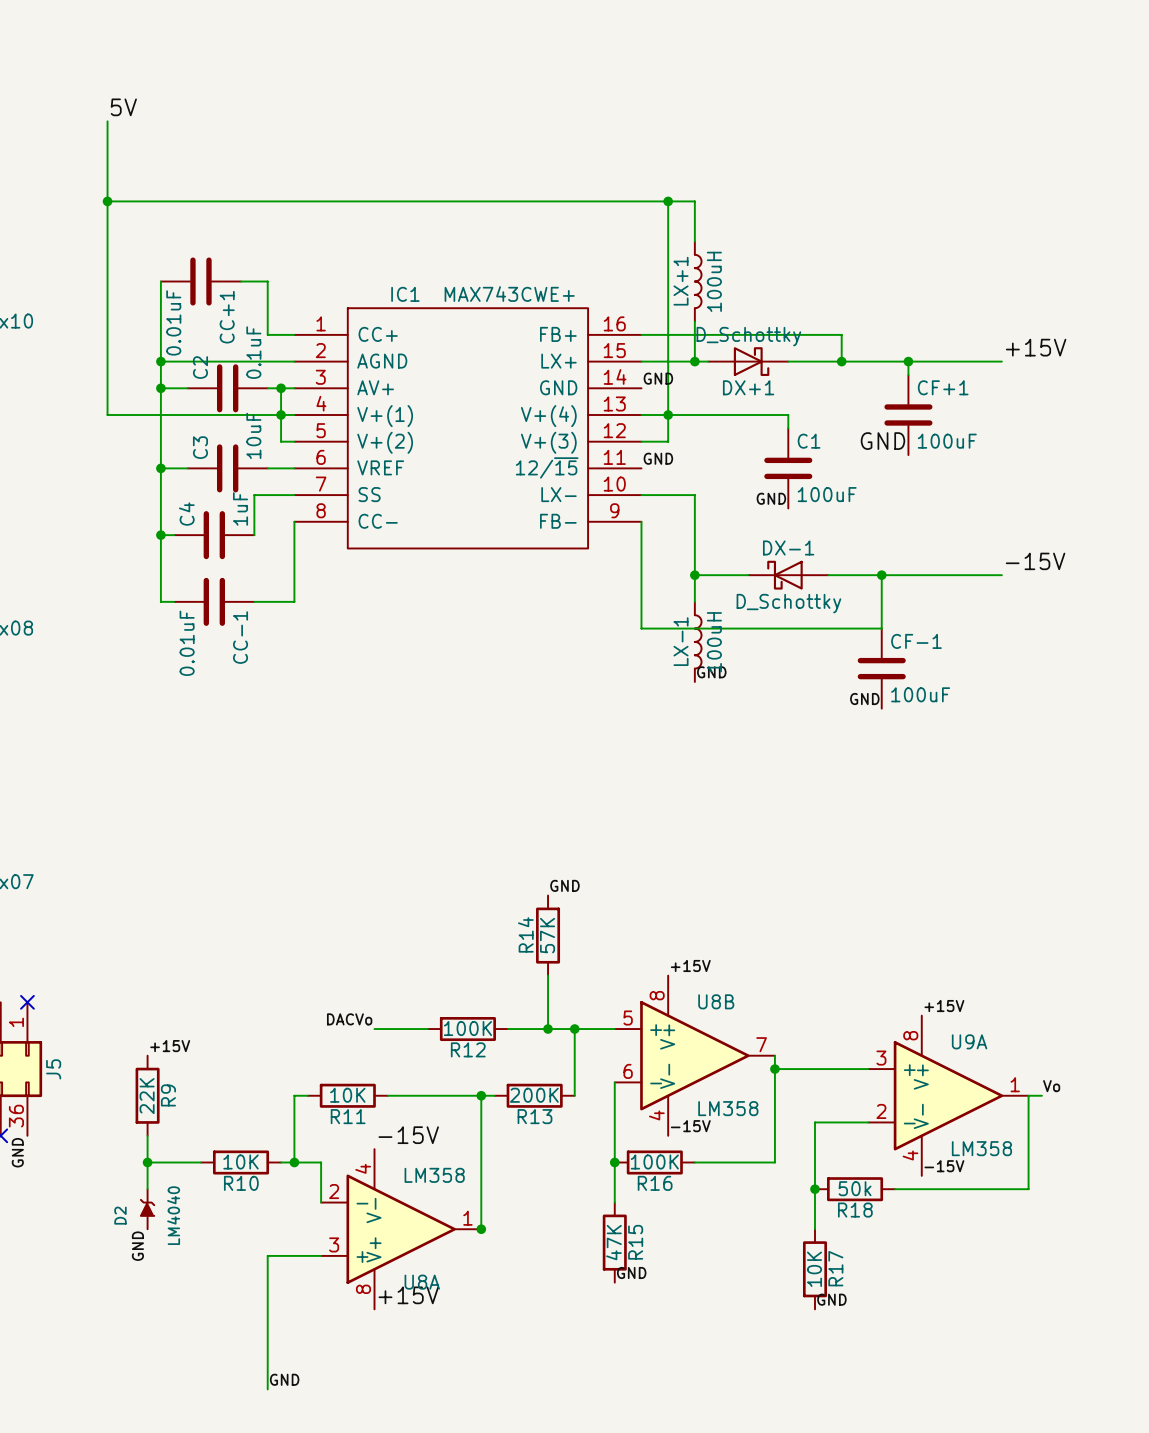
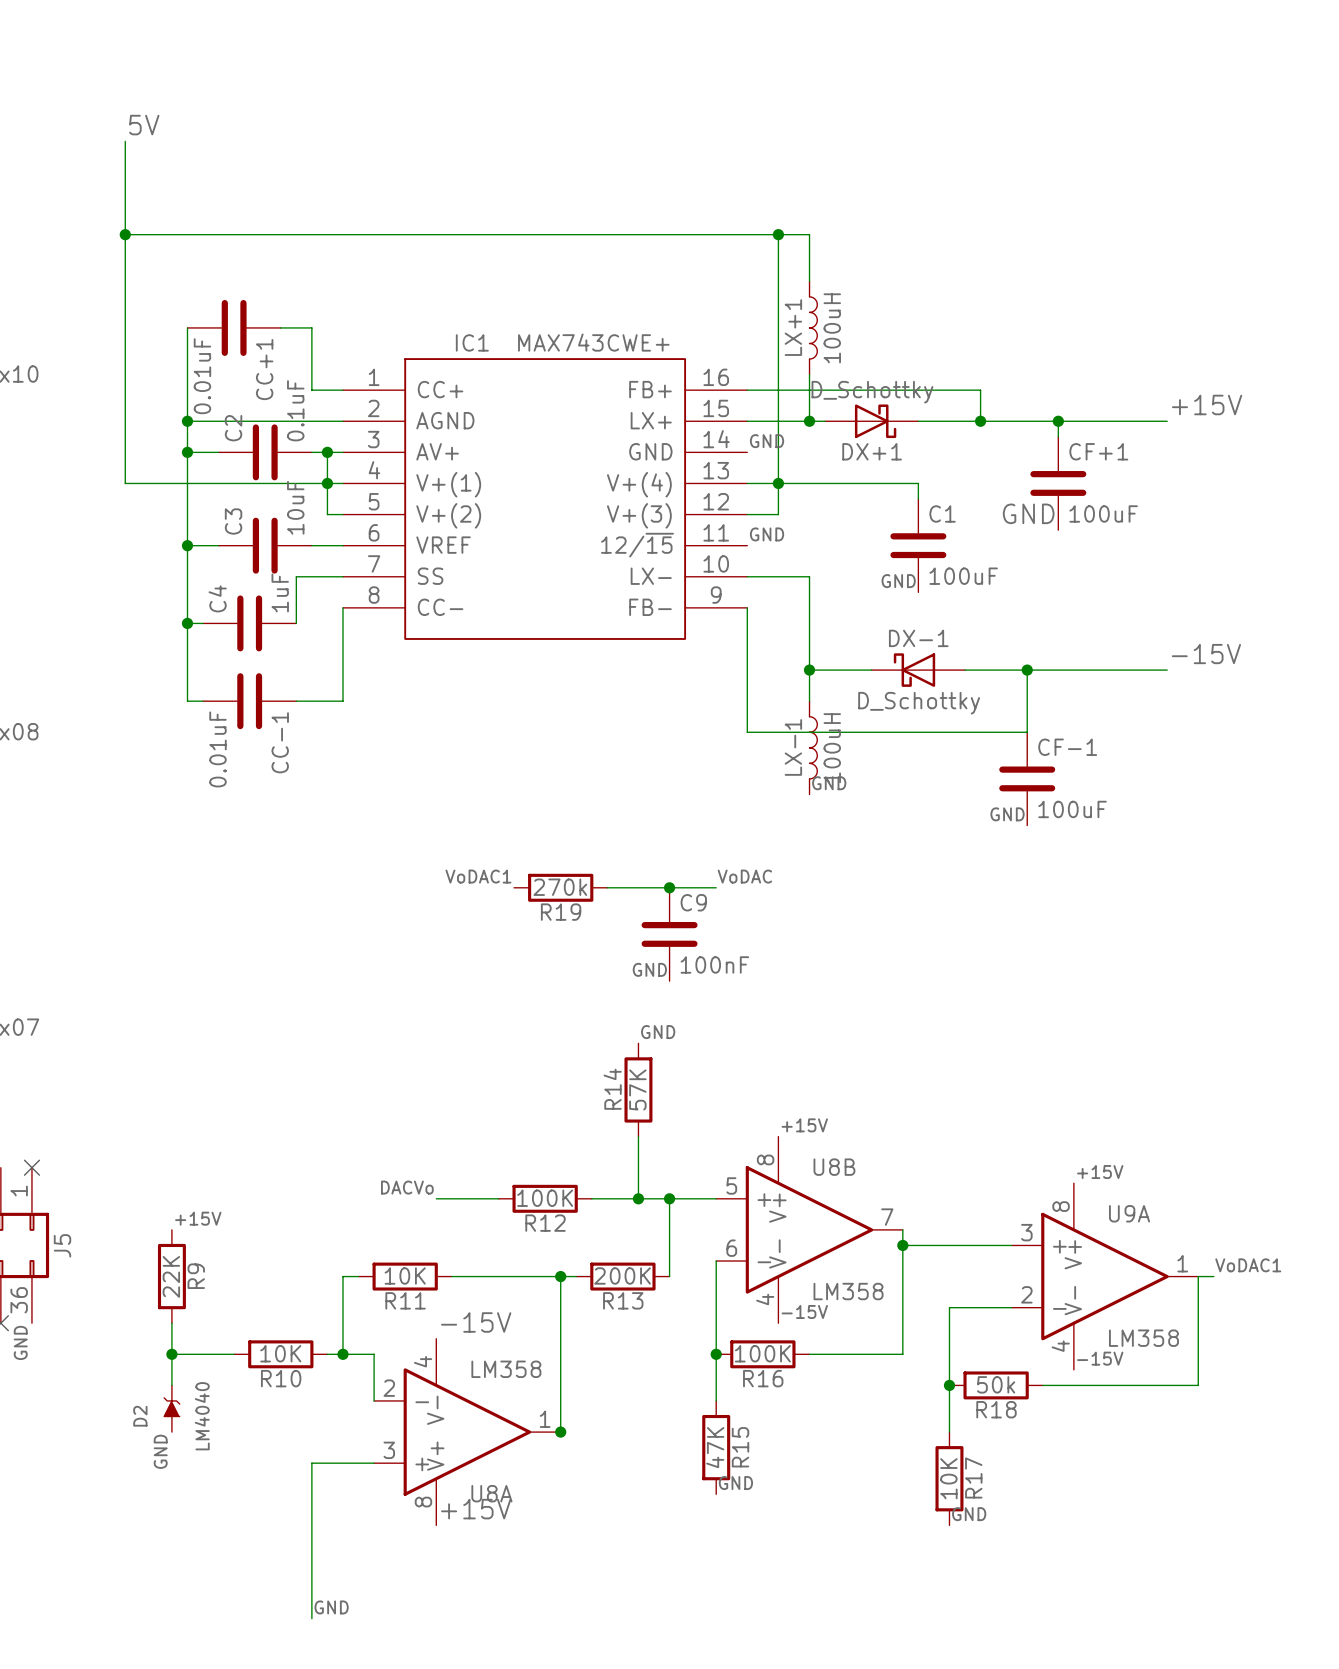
label: none -> VoDAC1 (478, 876)
label: none -> VoDAC (744, 876)
R19: none -> 270k (560, 887)
wire: none -> (607, 887) (716, 887)
junction: none -> (669, 887)
C9: none -> 100nF (669, 934)
label: none -> GND (649, 969)
label: Vo (1051, 1086) -> VoDAC1 (1248, 1265)

